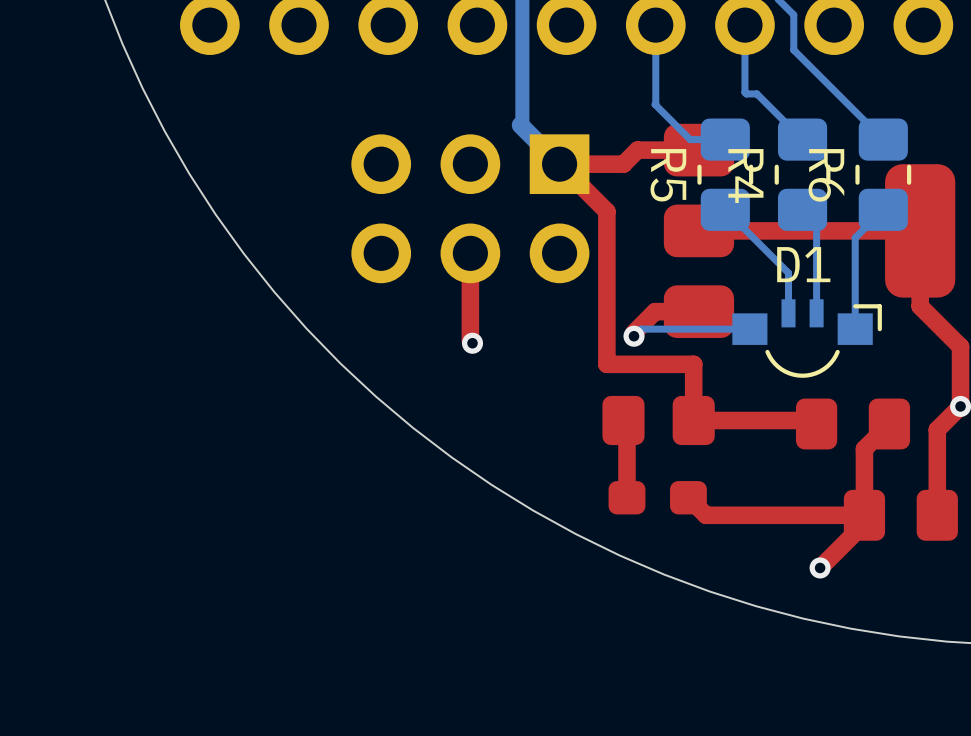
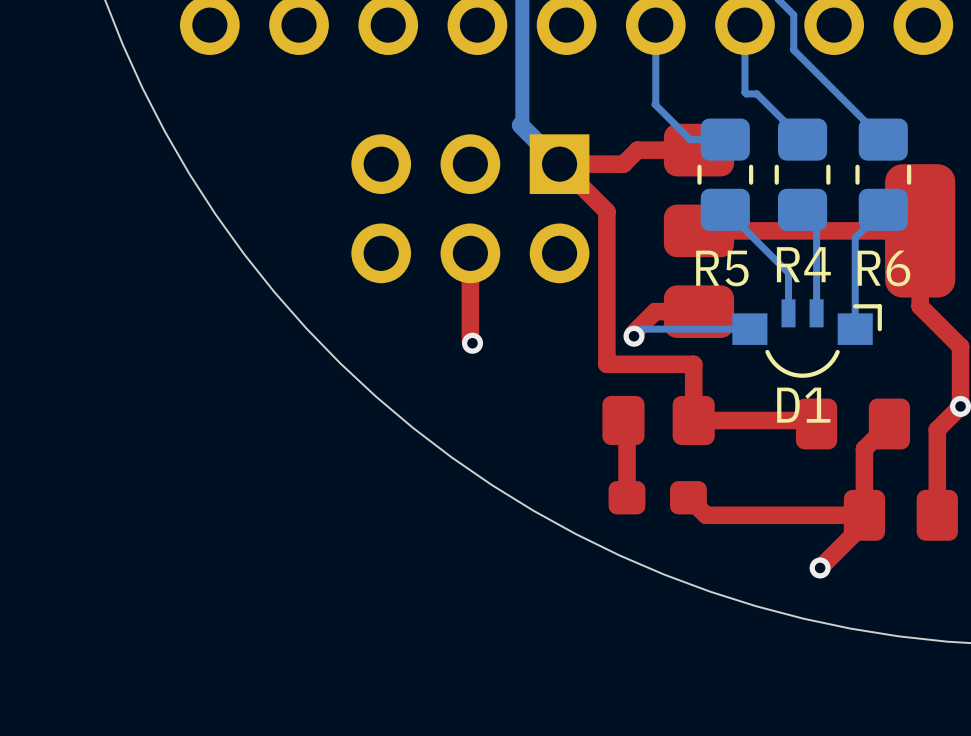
R5 name rotation: 0° (668, 175) -> 90° counterclockwise (722, 268)
R5 name position: R5 (668, 175) -> R5 (722, 268)
R6 name rotation: 0° (826, 175) -> 90° counterclockwise (883, 268)
R6 name position: R6 (826, 175) -> R6 (883, 268)
R4 name rotation: 0° (745, 176) -> 90° counterclockwise (803, 264)
R4 name position: R4 (745, 176) -> R4 (803, 264)
D1 name position: D1 (803, 264) -> D1 (803, 405)

